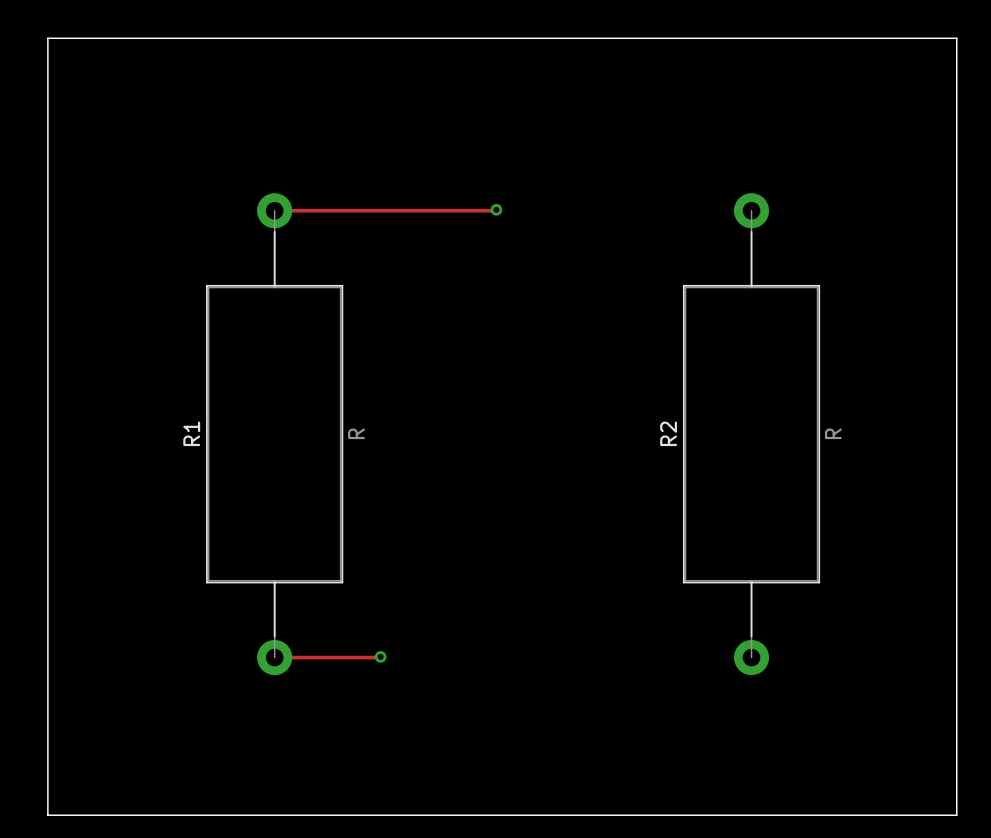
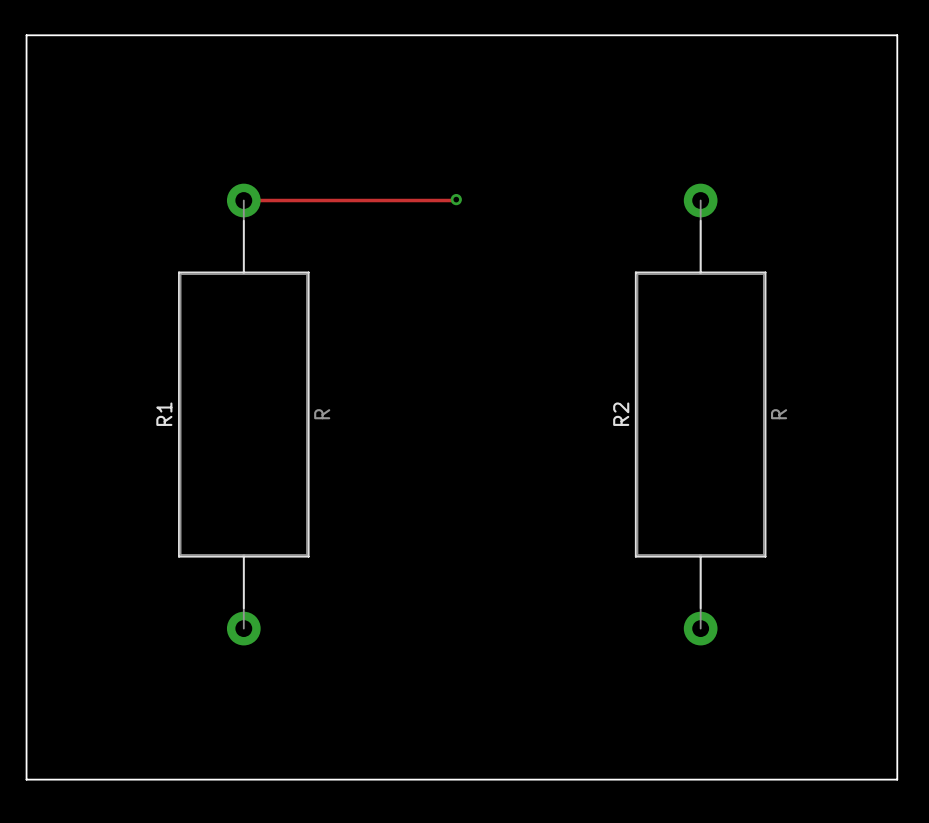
track: (380, 656) (274, 657) -> none
via: (380, 656) -> none

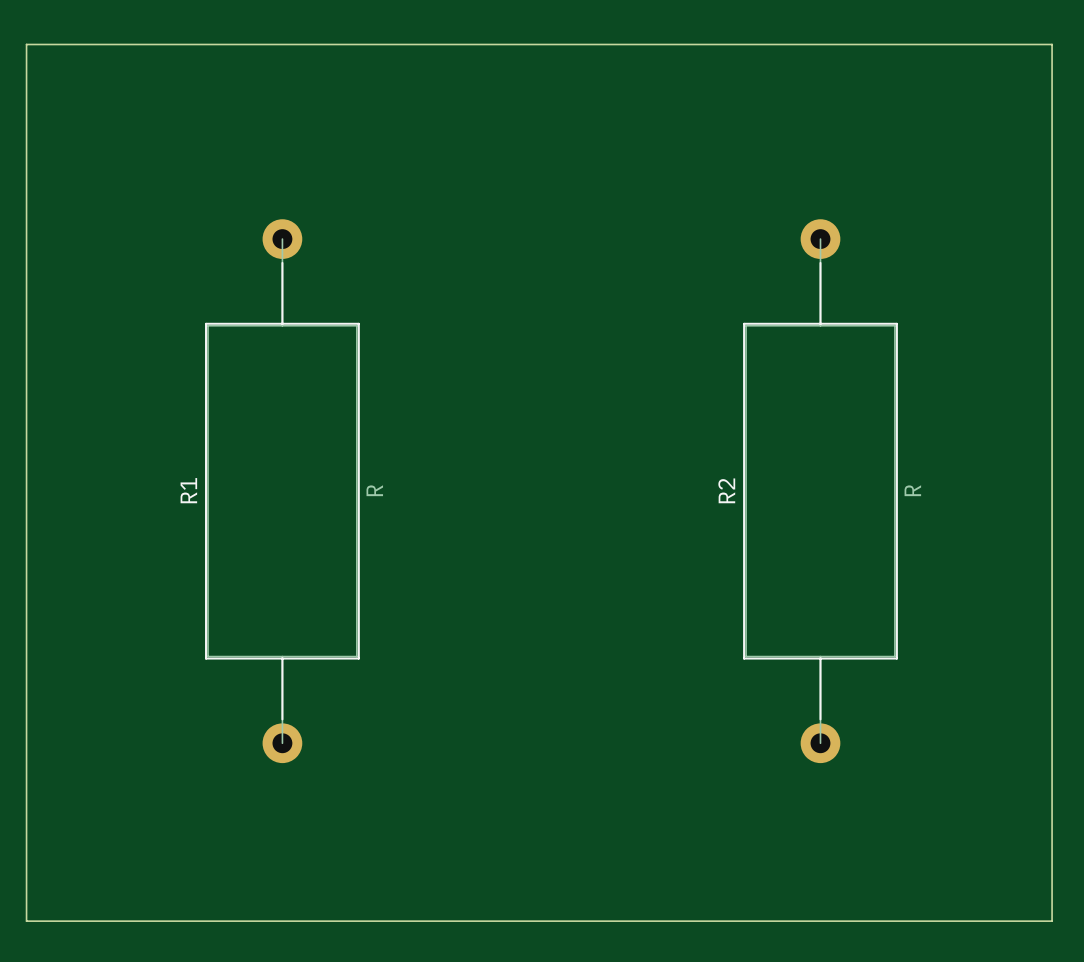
track: (456, 199) (243, 200) -> none
via: (456, 199) -> none

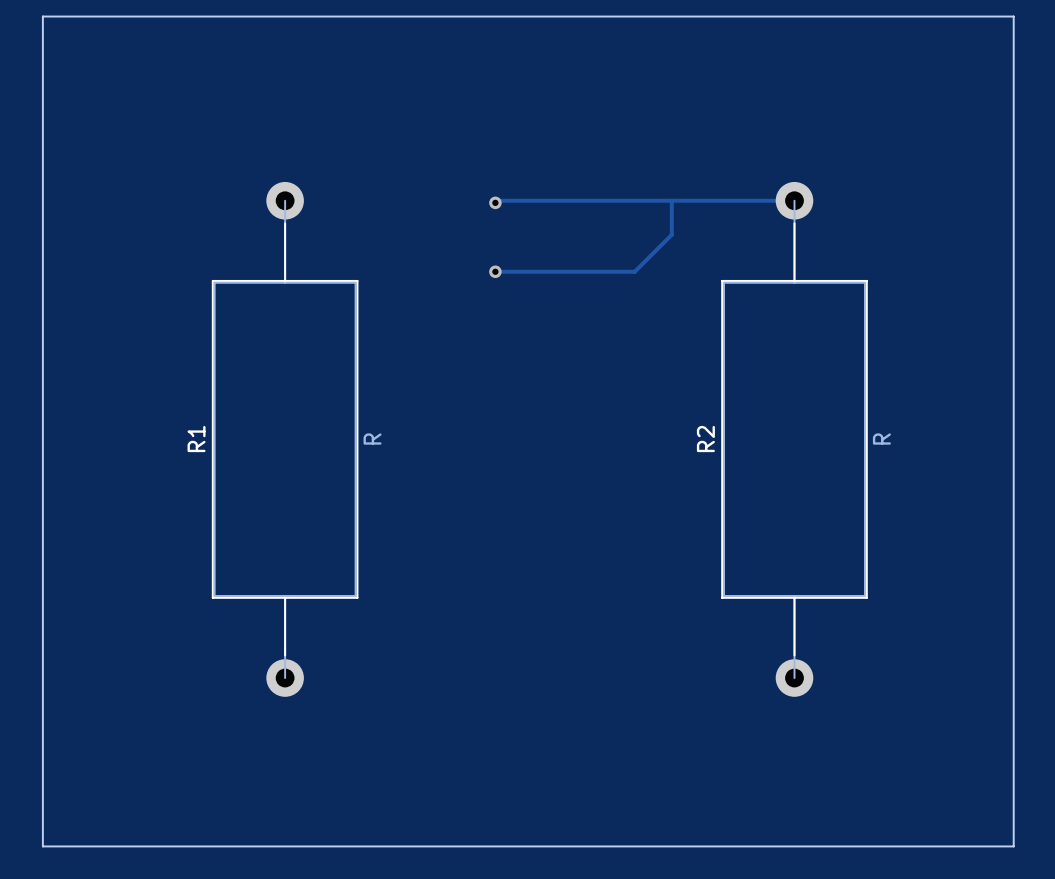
track: none -> (671, 200) (671, 234) (634, 271) (495, 271)
track: none -> (794, 200) (497, 200) (495, 202)
via: none -> (495, 202)
via: none -> (495, 271)

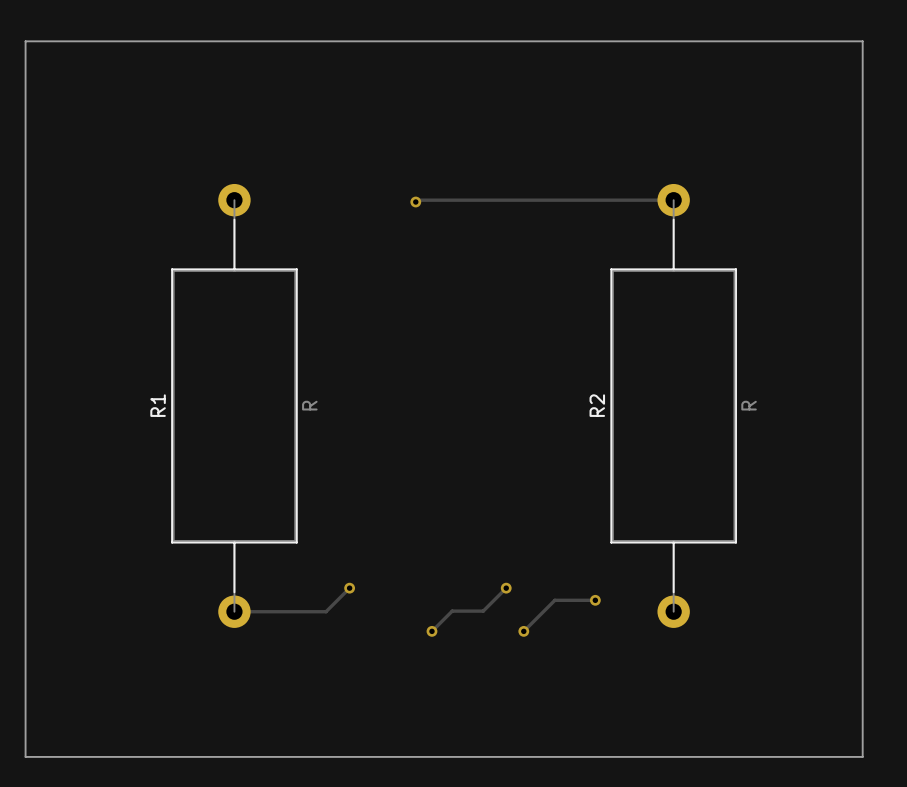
track: (671, 200) (671, 234) (634, 271) (495, 271) -> none
via: (495, 271) -> none
track: none -> (349, 588) (326, 611) (234, 611)
via: none -> (349, 588)
track: none -> (506, 588) (483, 611) (452, 611) (431, 631)
via: none -> (506, 588)
track: none -> (595, 600) (554, 600) (523, 631)
via: none -> (595, 600)
via: none -> (431, 631)
via: none -> (523, 631)

